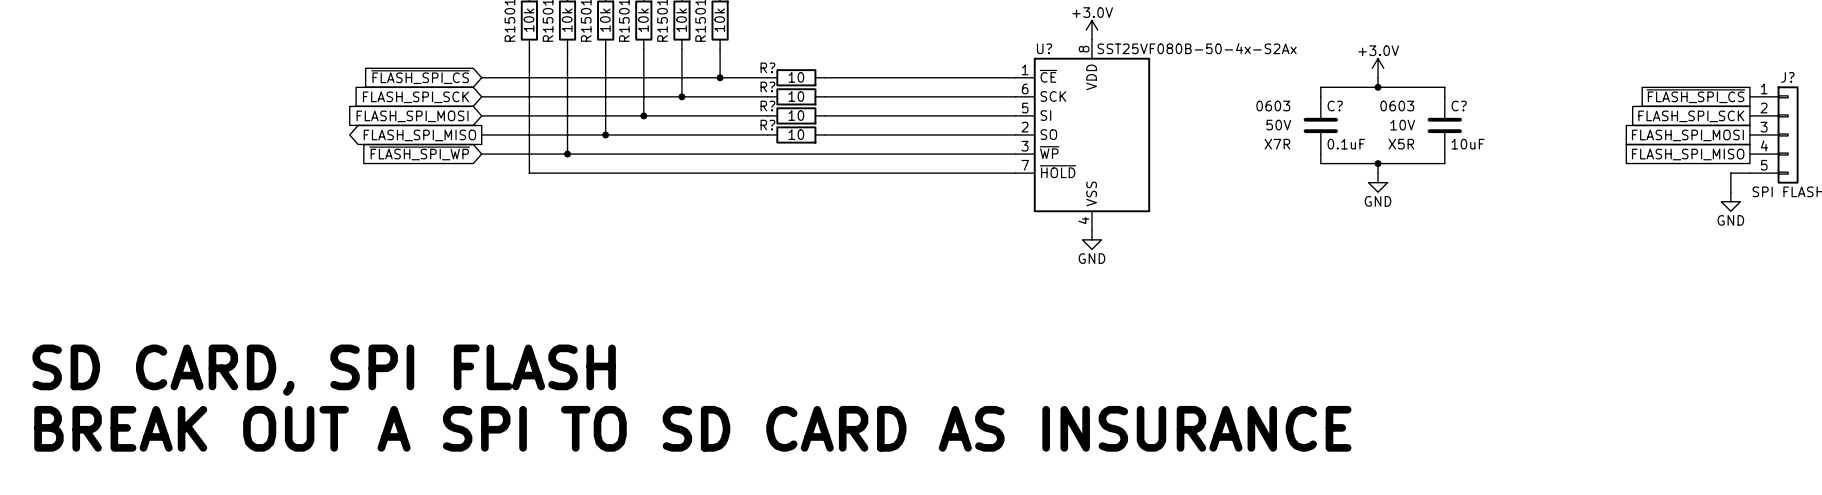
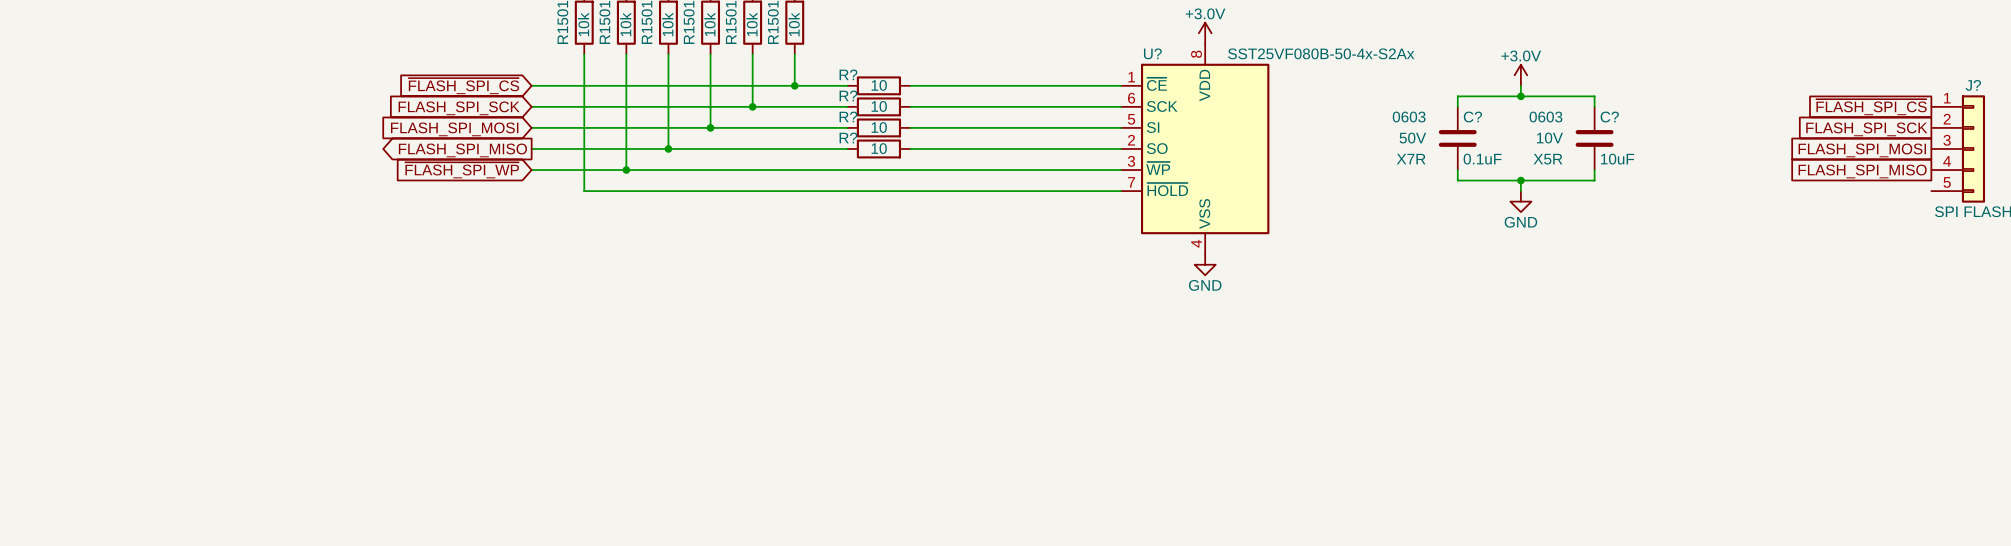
wire: (1749, 173) (1730, 173) (1730, 192) -> none
power symbol: GND (1730, 201) -> none
text: SD CARD, SPI FLASH (324, 370) -> none
text: BREAK OUT A SPI TO SD CARD AS INSURANCE (692, 428) -> none

